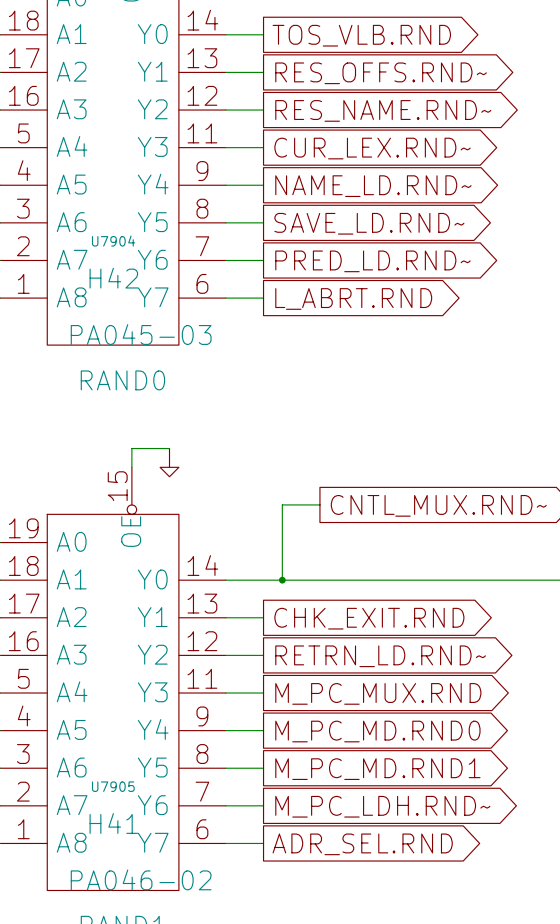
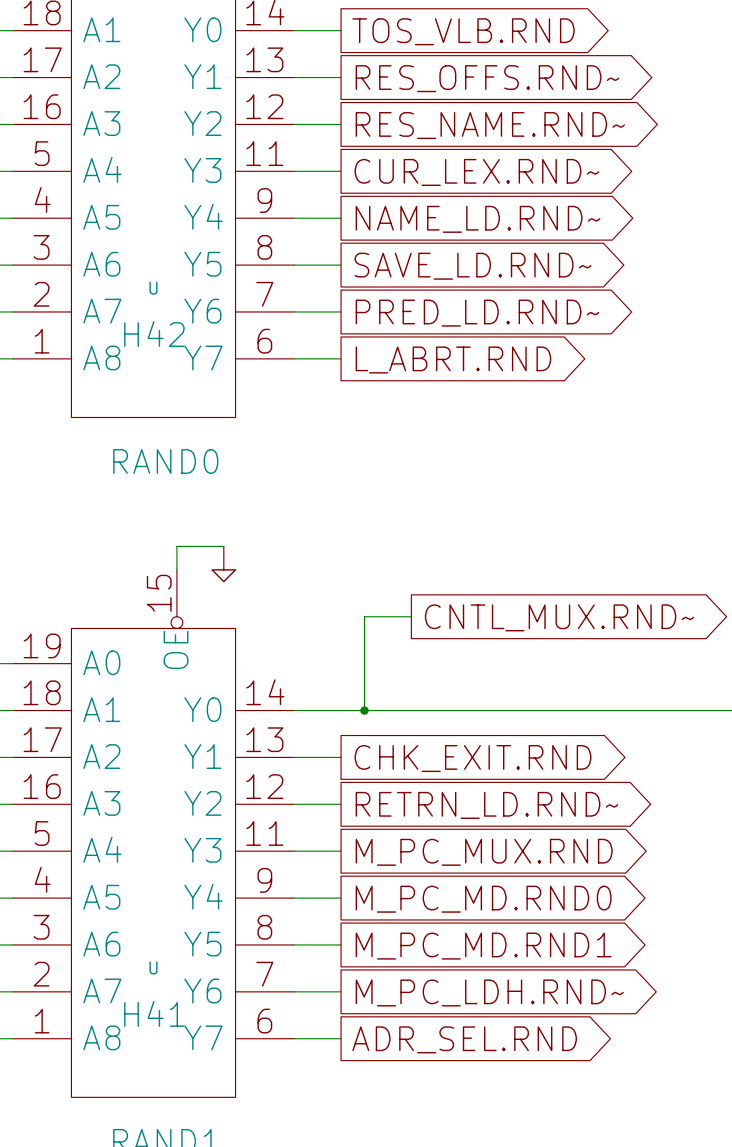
U7904 name: U7904 (113, 241) -> U (153, 288)
U7904 value: PA045-03 (141, 334) -> none
U7905 name: U7905 (113, 786) -> U (153, 967)
U7905 value: PA046-02 (141, 879) -> none

